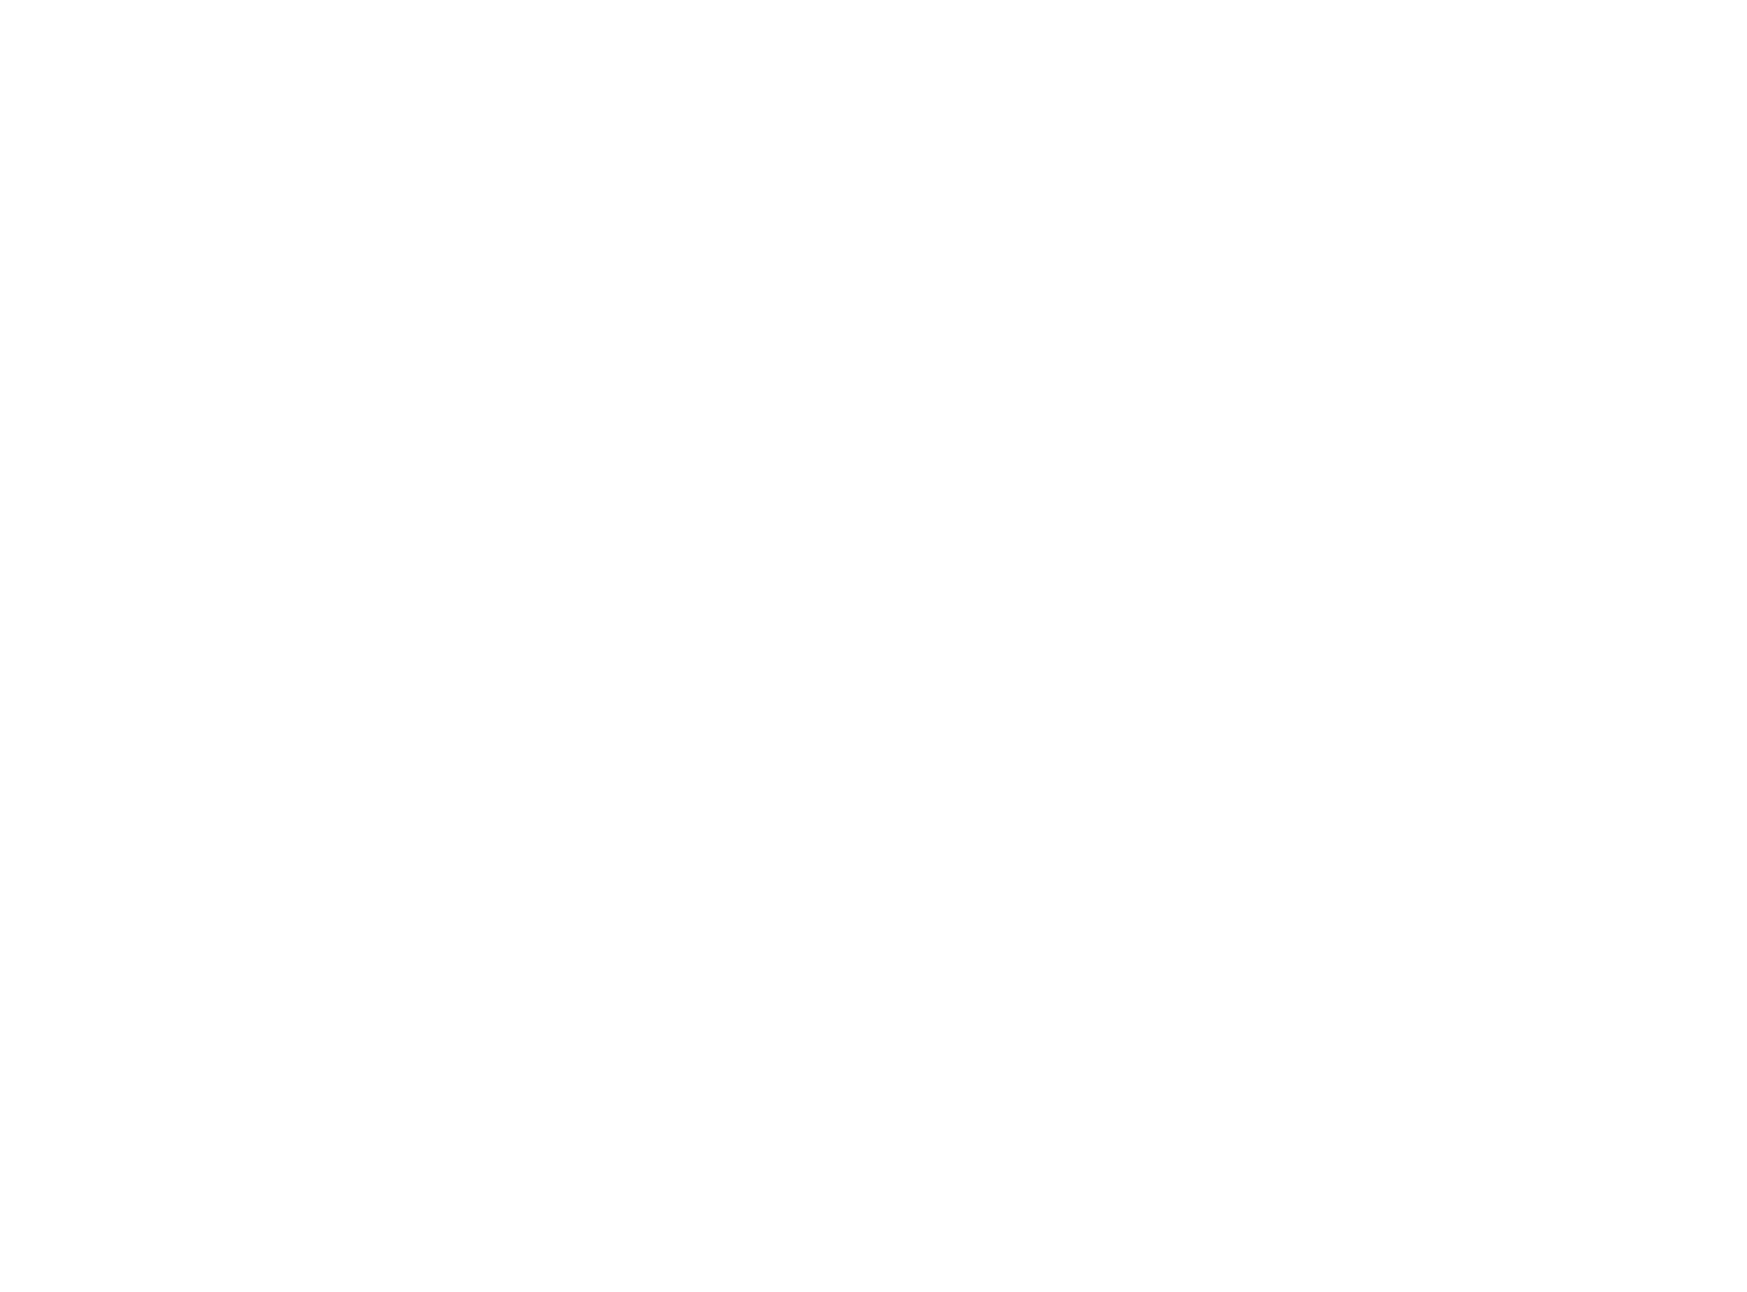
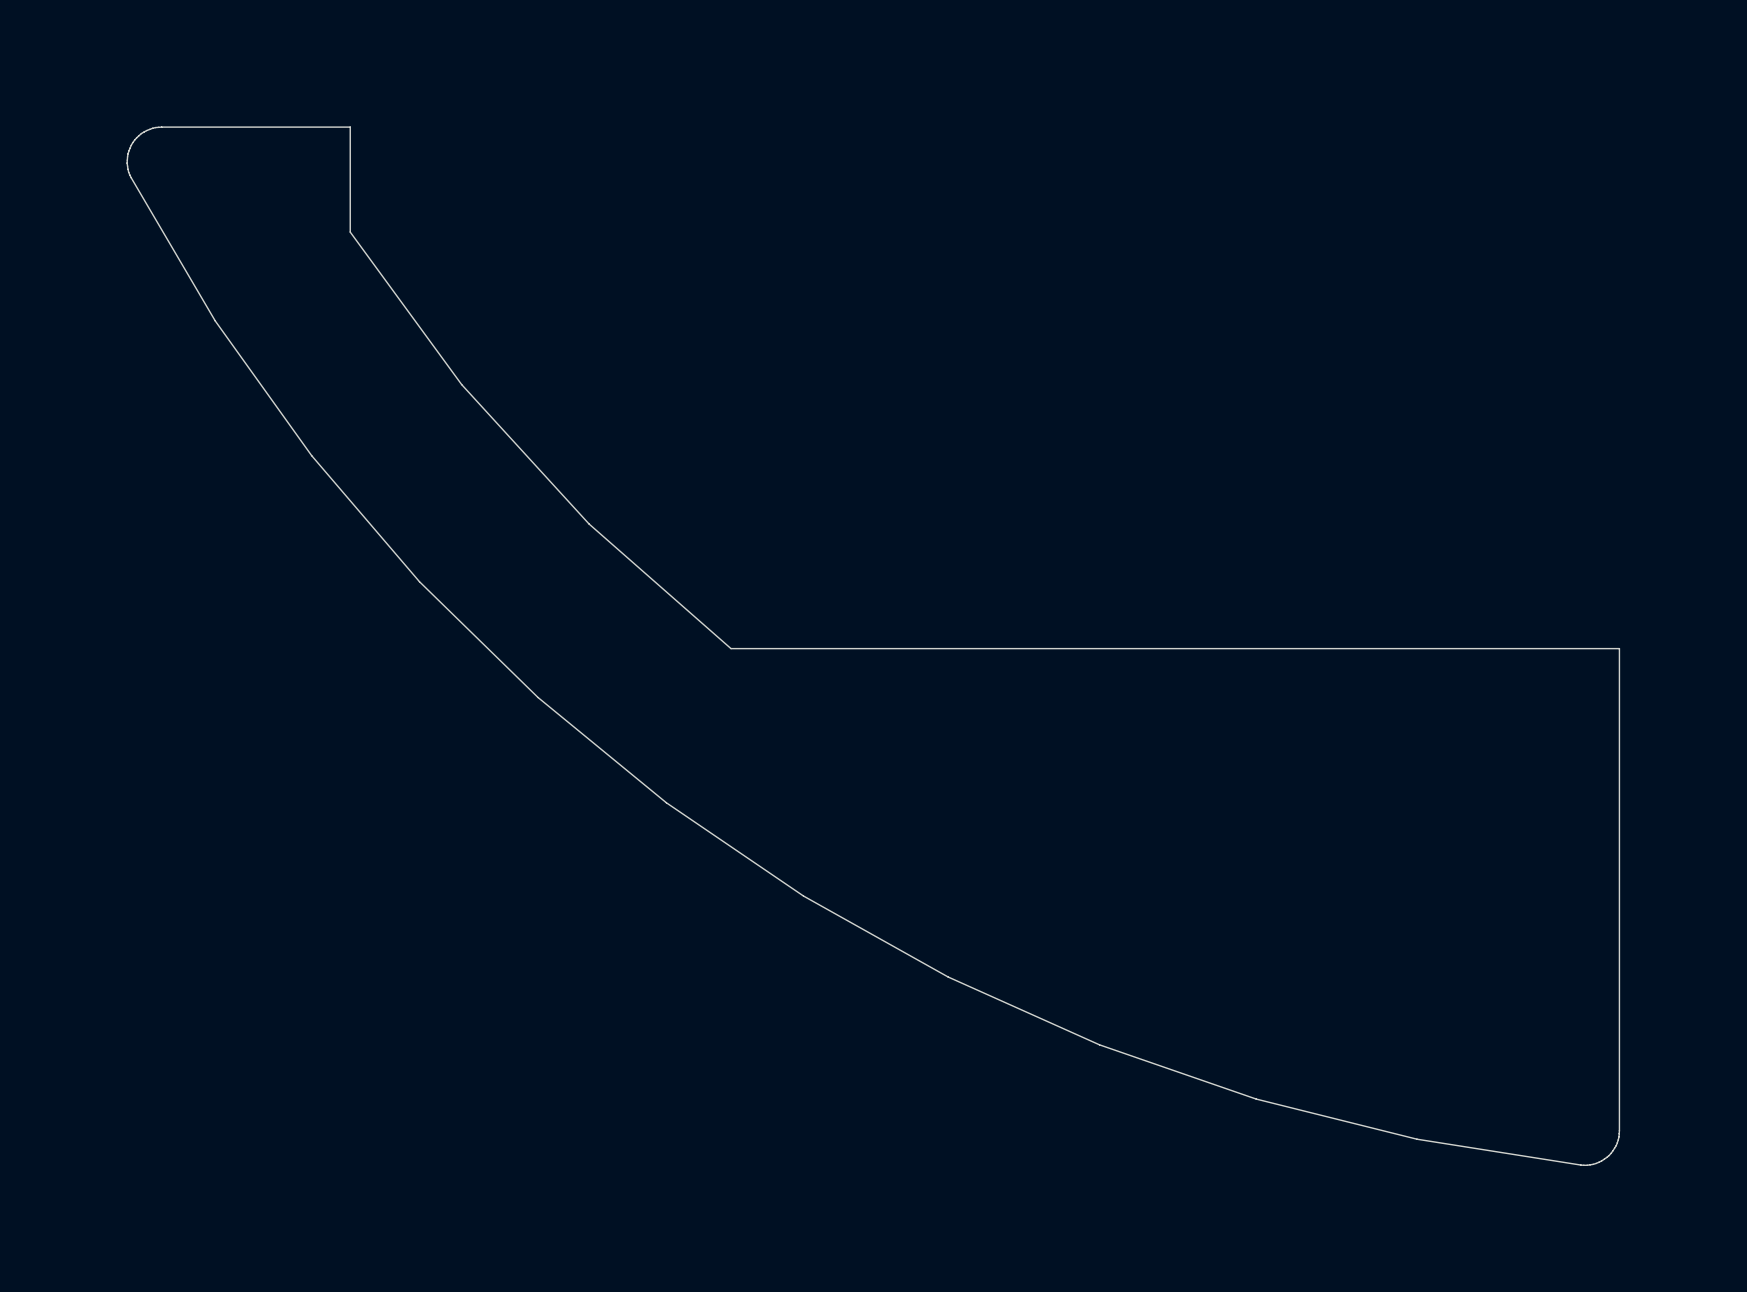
board edge: none -> (161, 127) (350, 127) (350, 232) (461, 384) (589, 524) (731, 648) (1619, 648) (1619, 1130) (1618, 1139) (1612, 1150) (1598, 1162) (1583, 1165) (1417, 1139) (1256, 1099) (1099, 1044) (948, 976) (803, 895) (666, 802) (538, 697) (419, 581) (311, 455) (215, 320) (129, 175) (127, 156) (132, 142) (146, 130) (161, 127)

